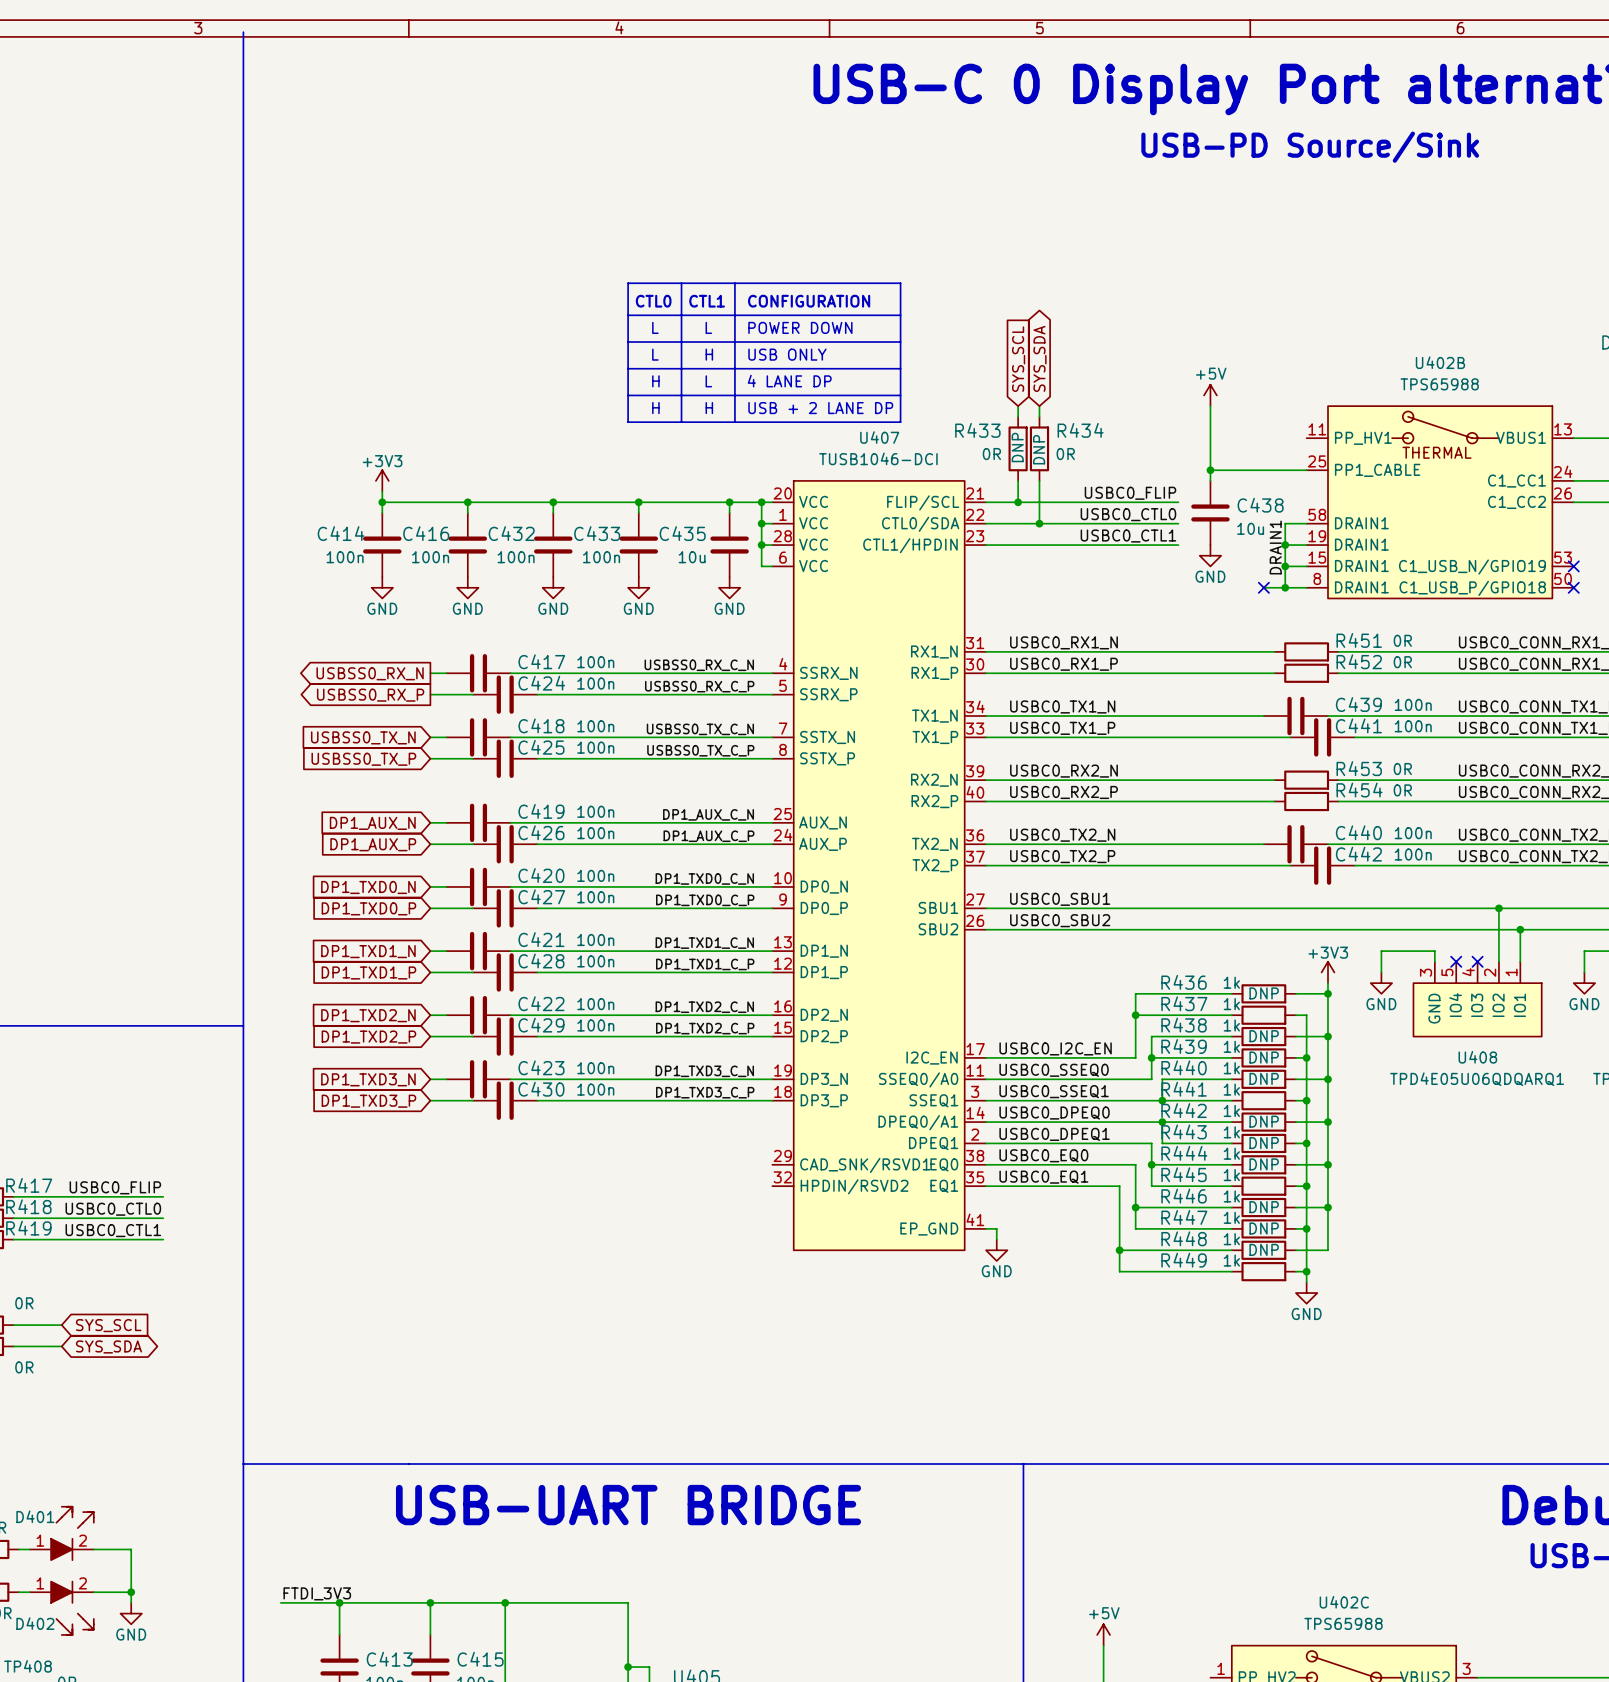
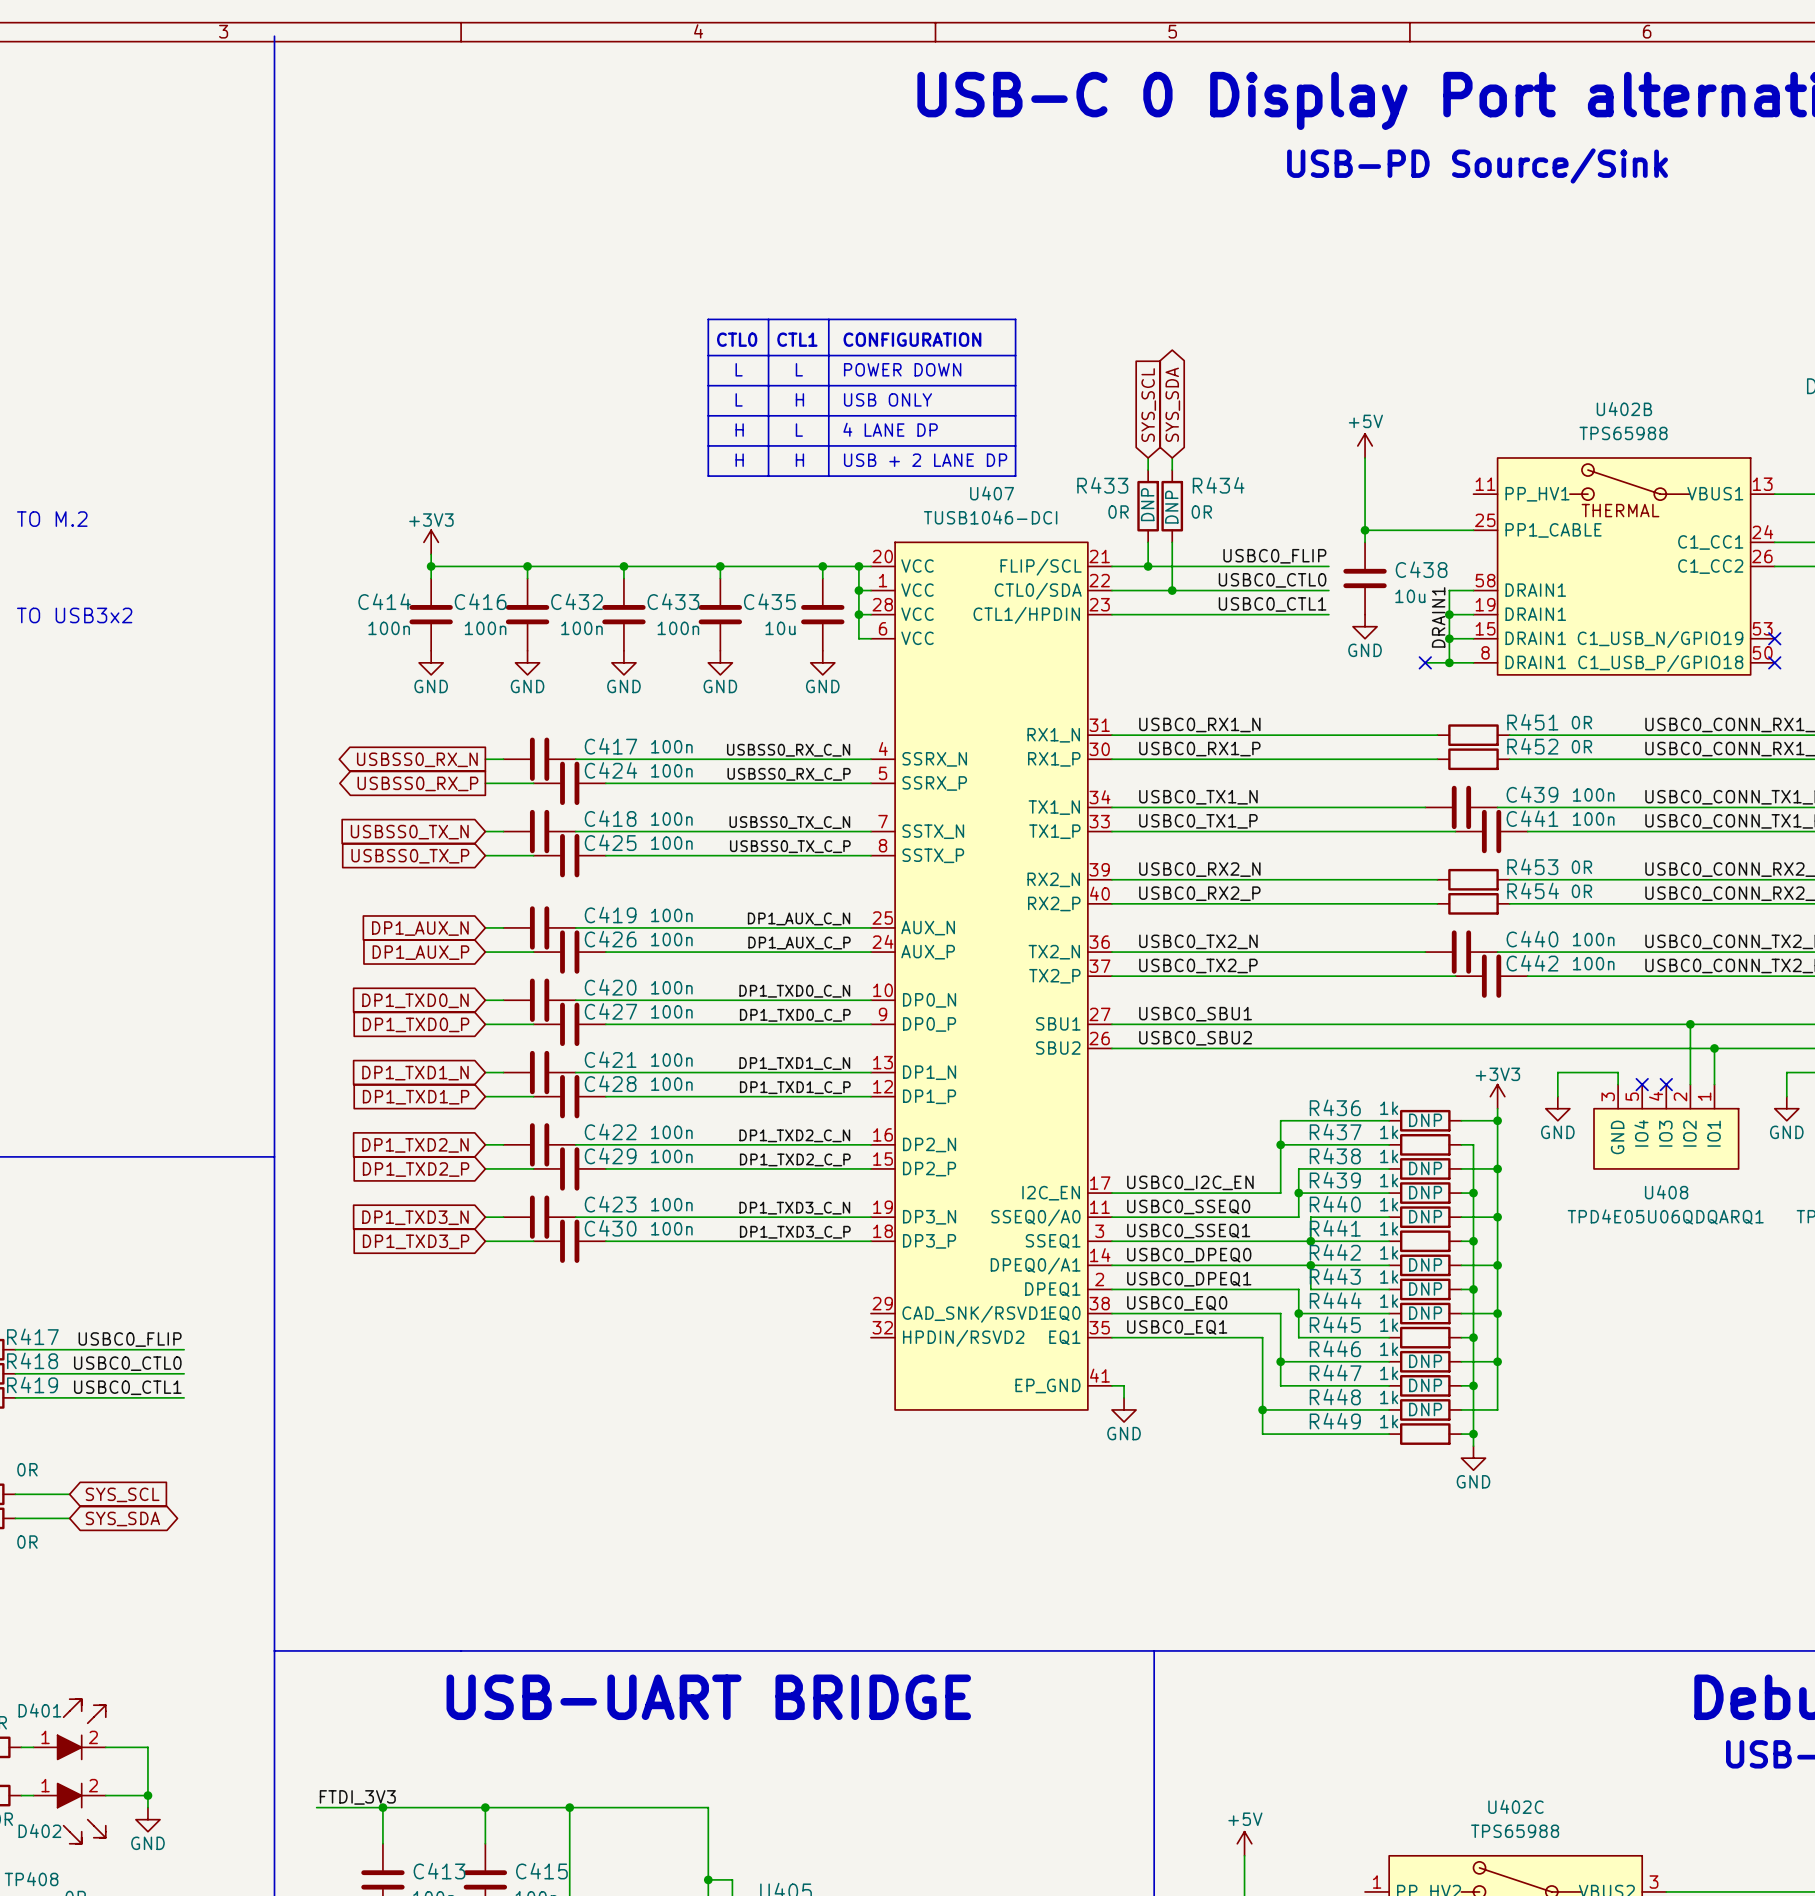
text: none -> TO M.2 (52, 519)
text: none -> TO USB3x2 (74, 615)

